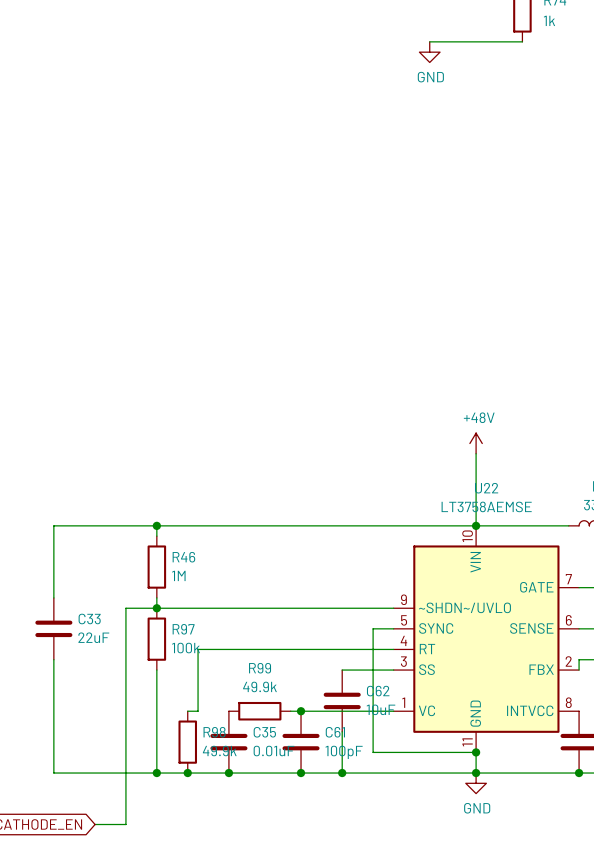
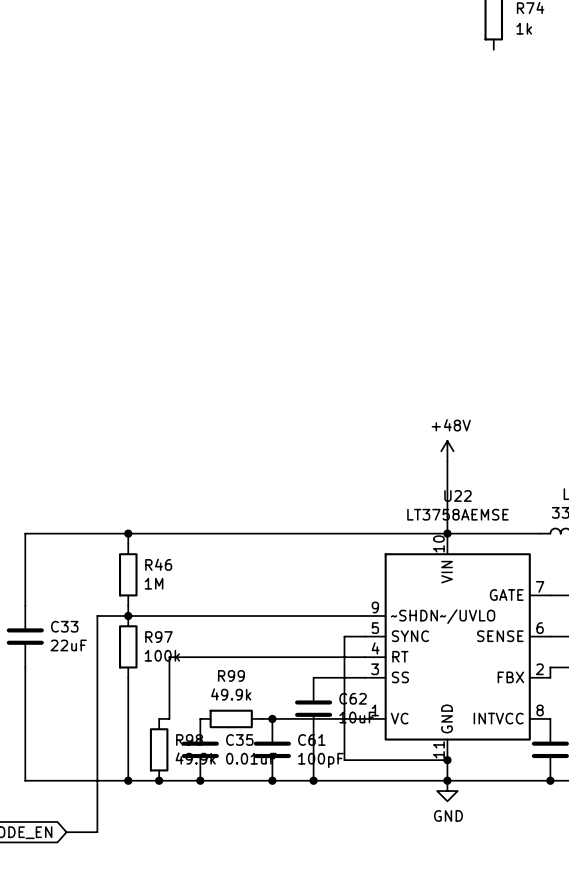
wire: (429, 41) (522, 41) -> none
power symbol: GND (429, 52) -> none

